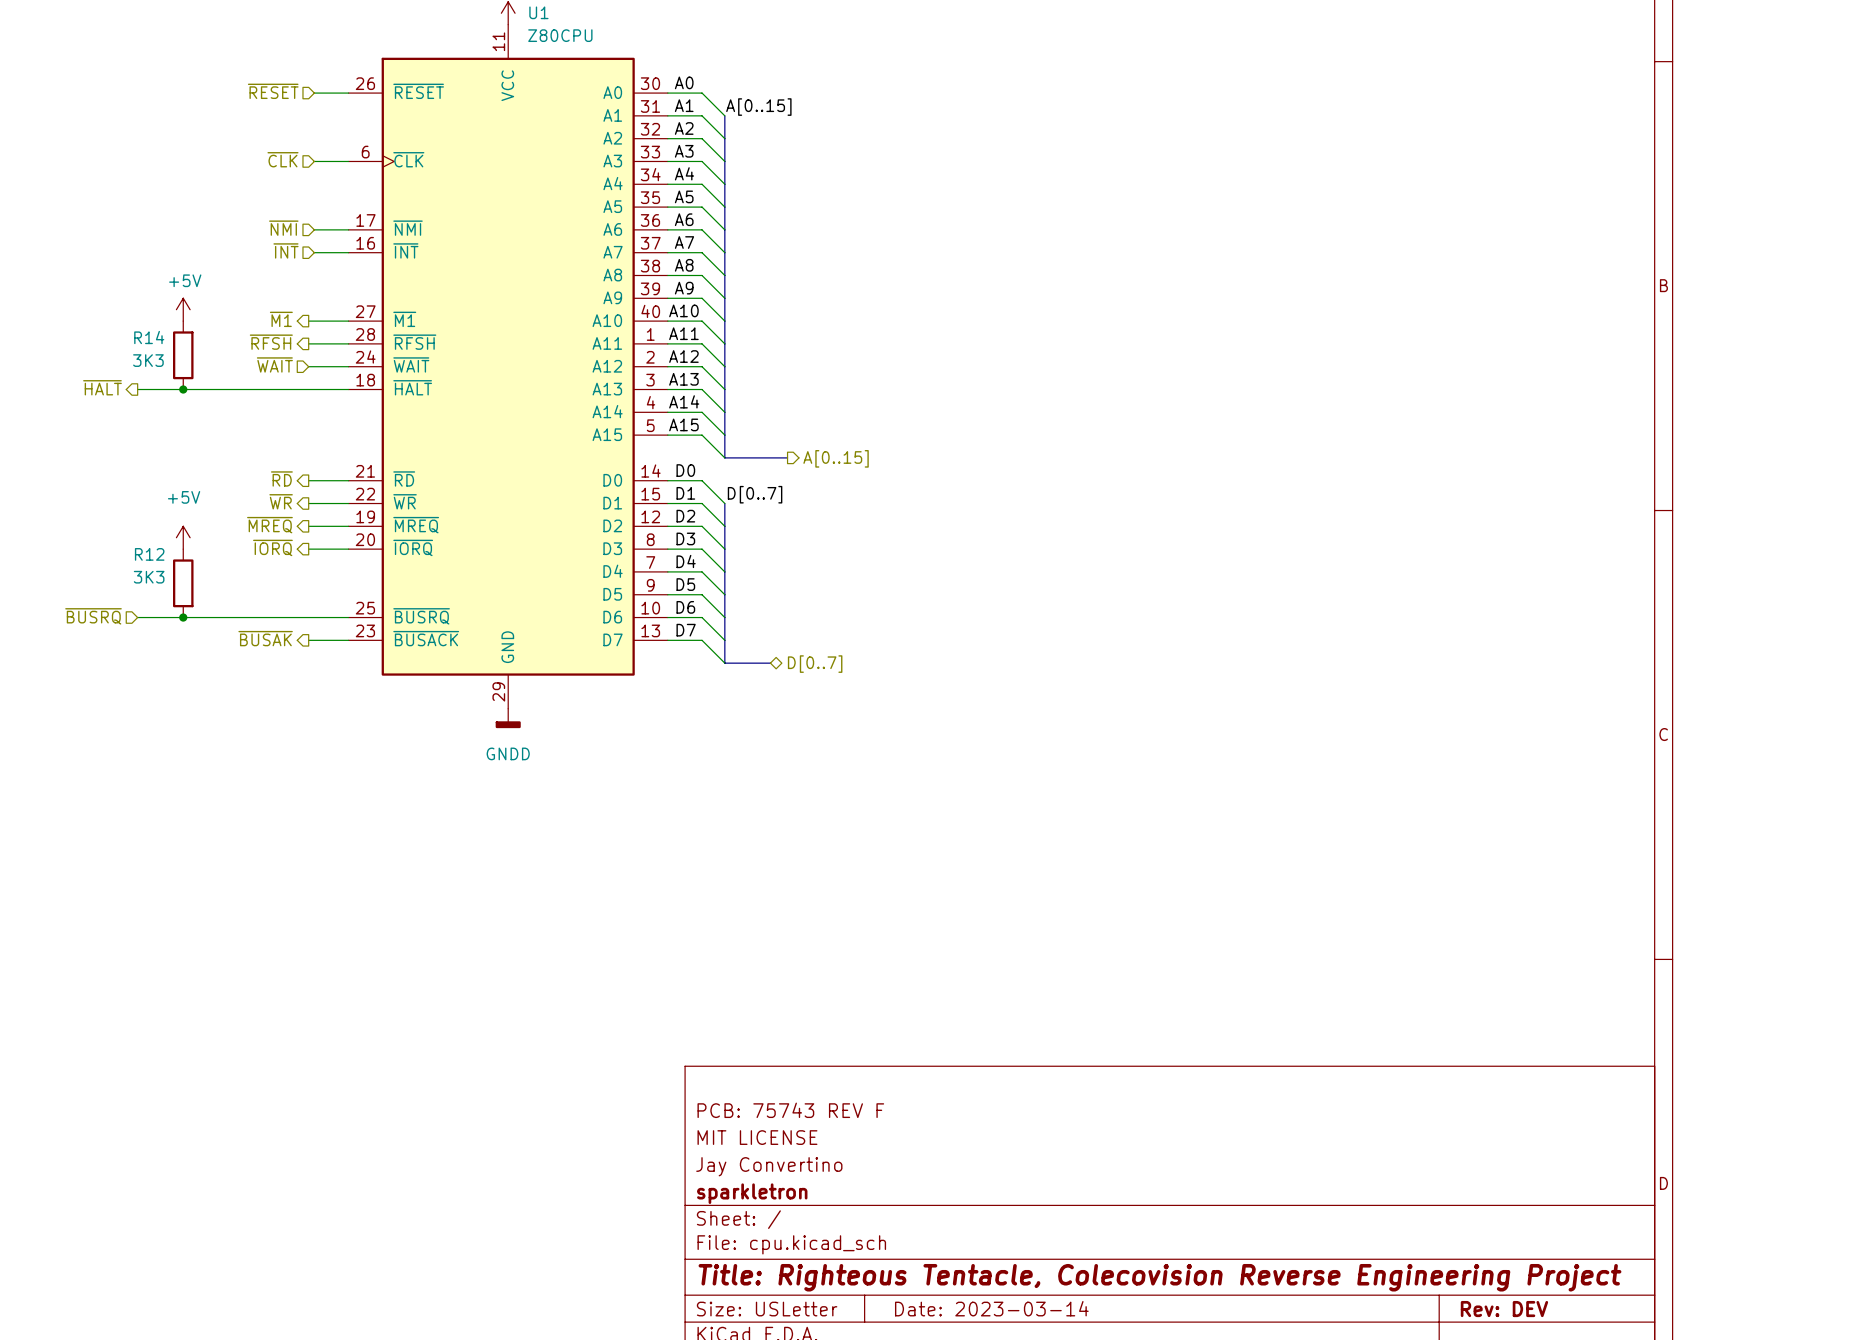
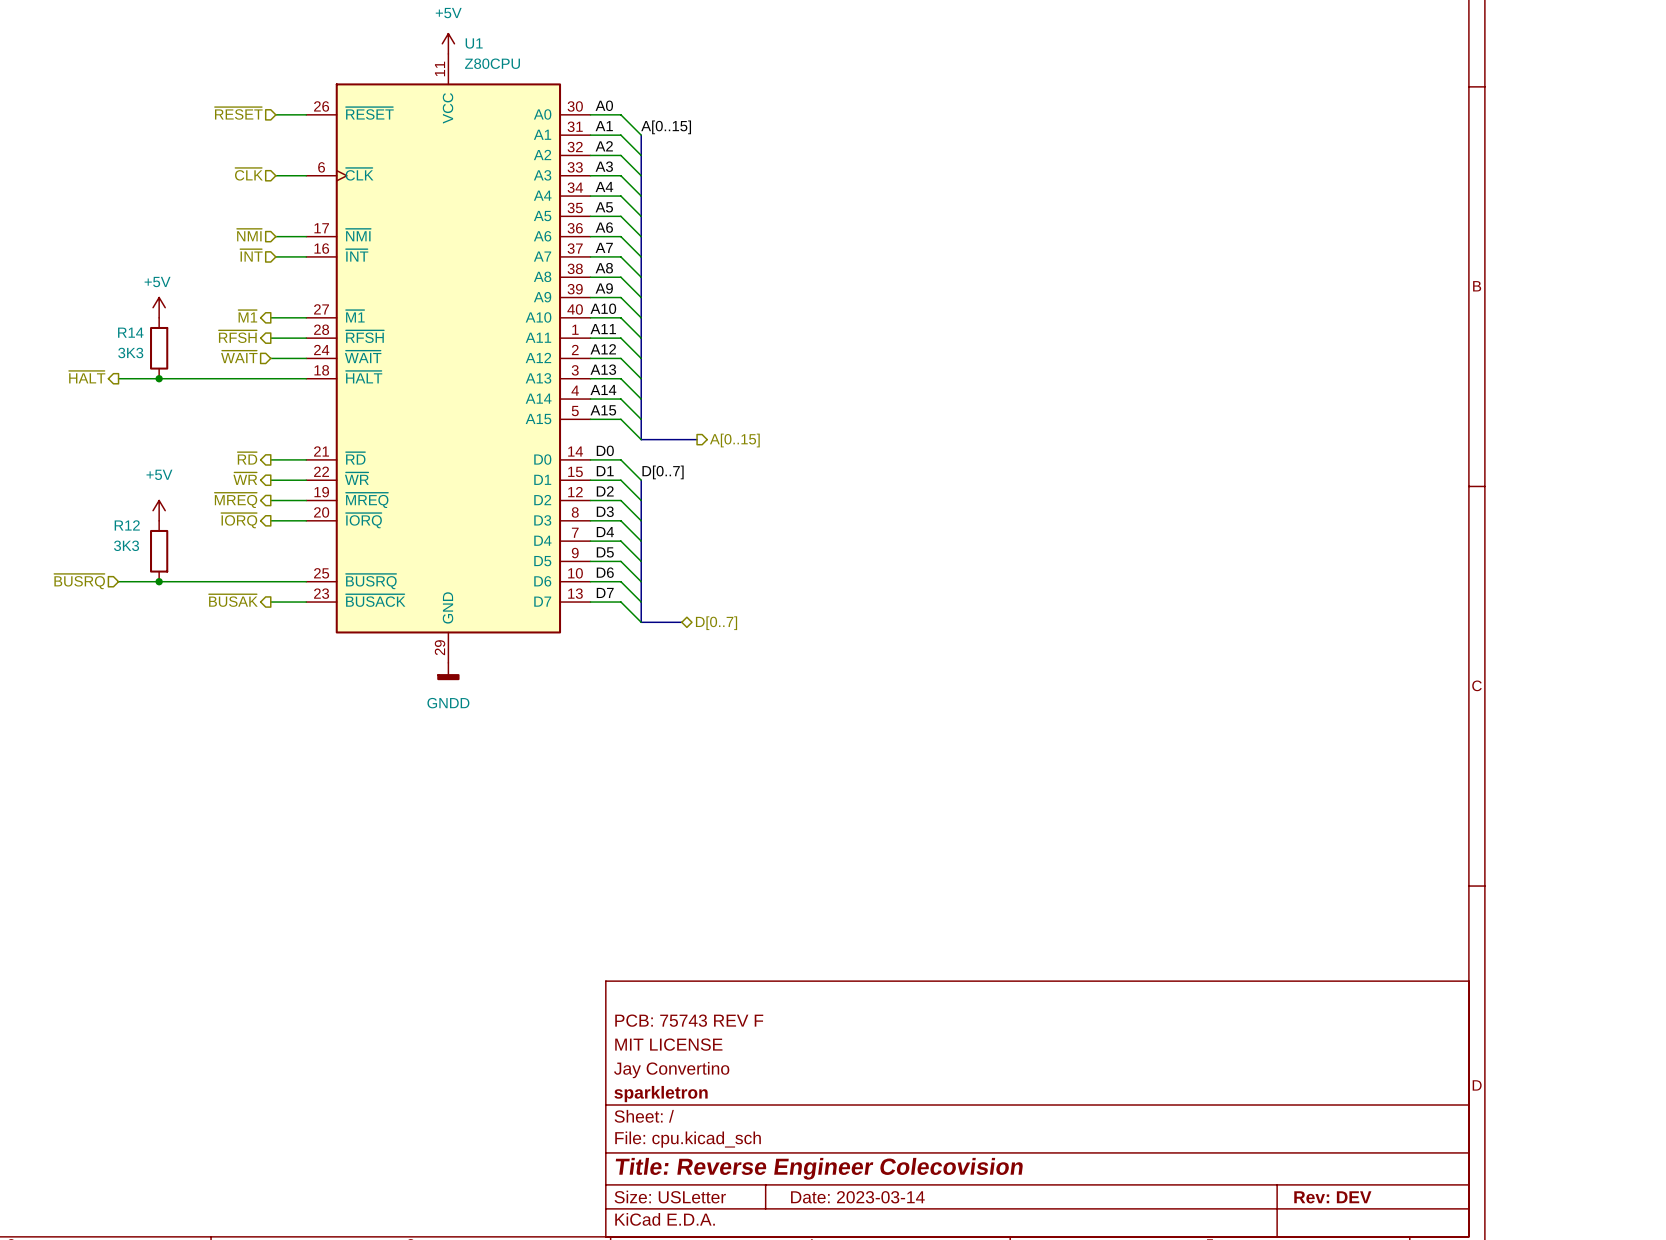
title block: Title: Righteous Tentacle, Colecovision Reverse Engineering Project (1159, 1277) -> Title: Reverse Engineer Colecovision (819, 1168)

